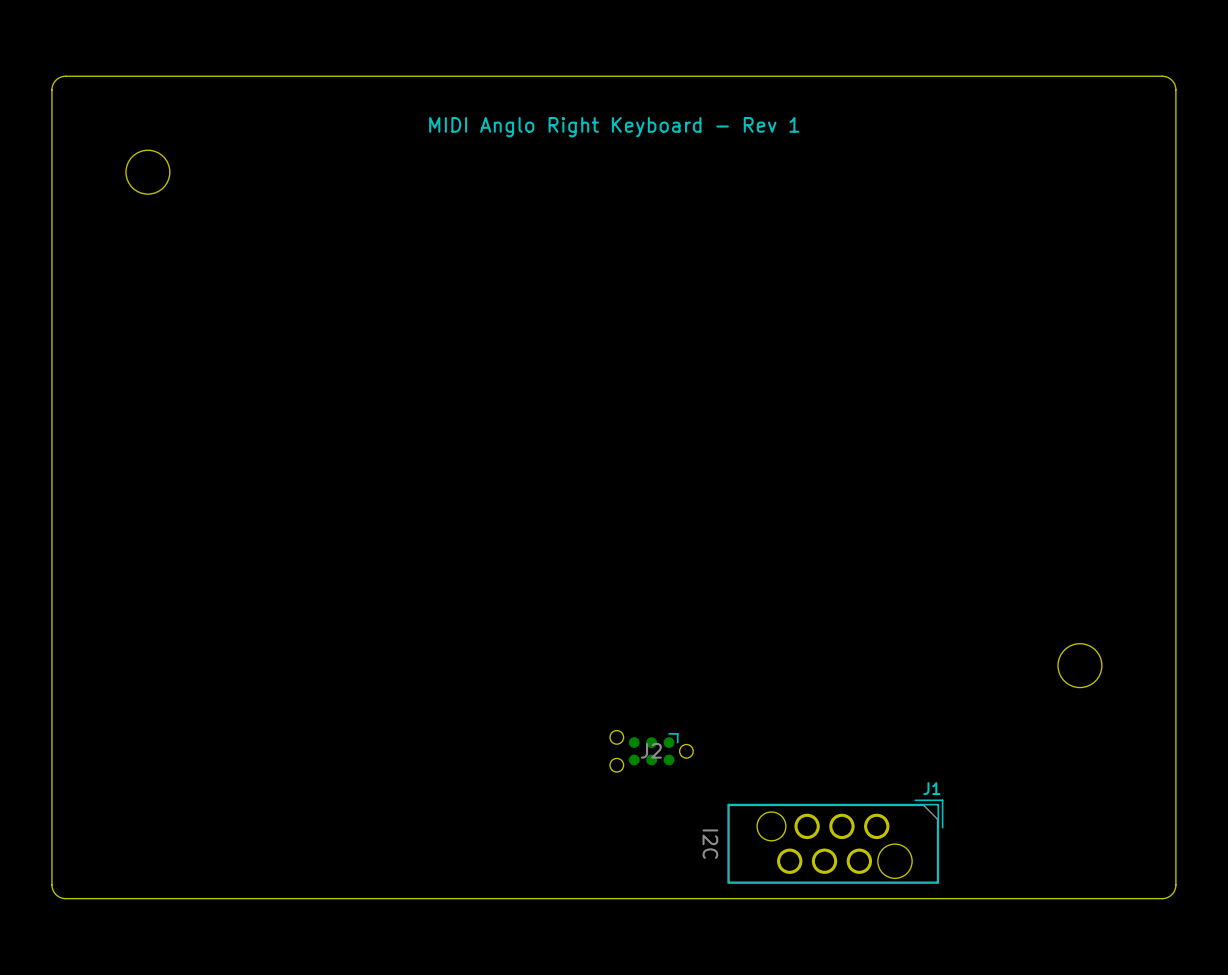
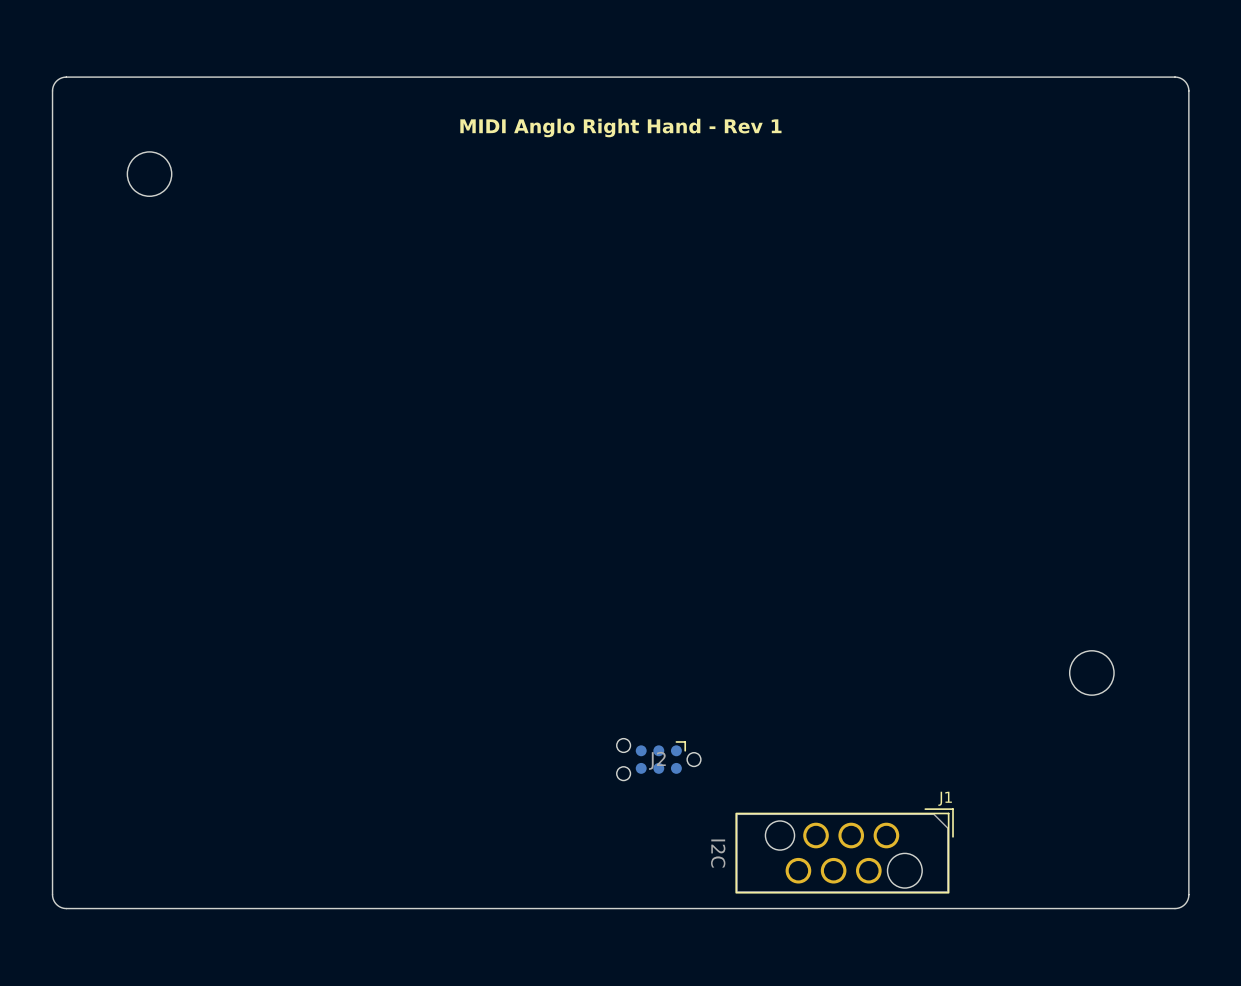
text: MIDI Anglo Right Keyboard - Rev 1 (614, 127) -> MIDI Anglo Right Hand - Rev 1 (620, 128)

